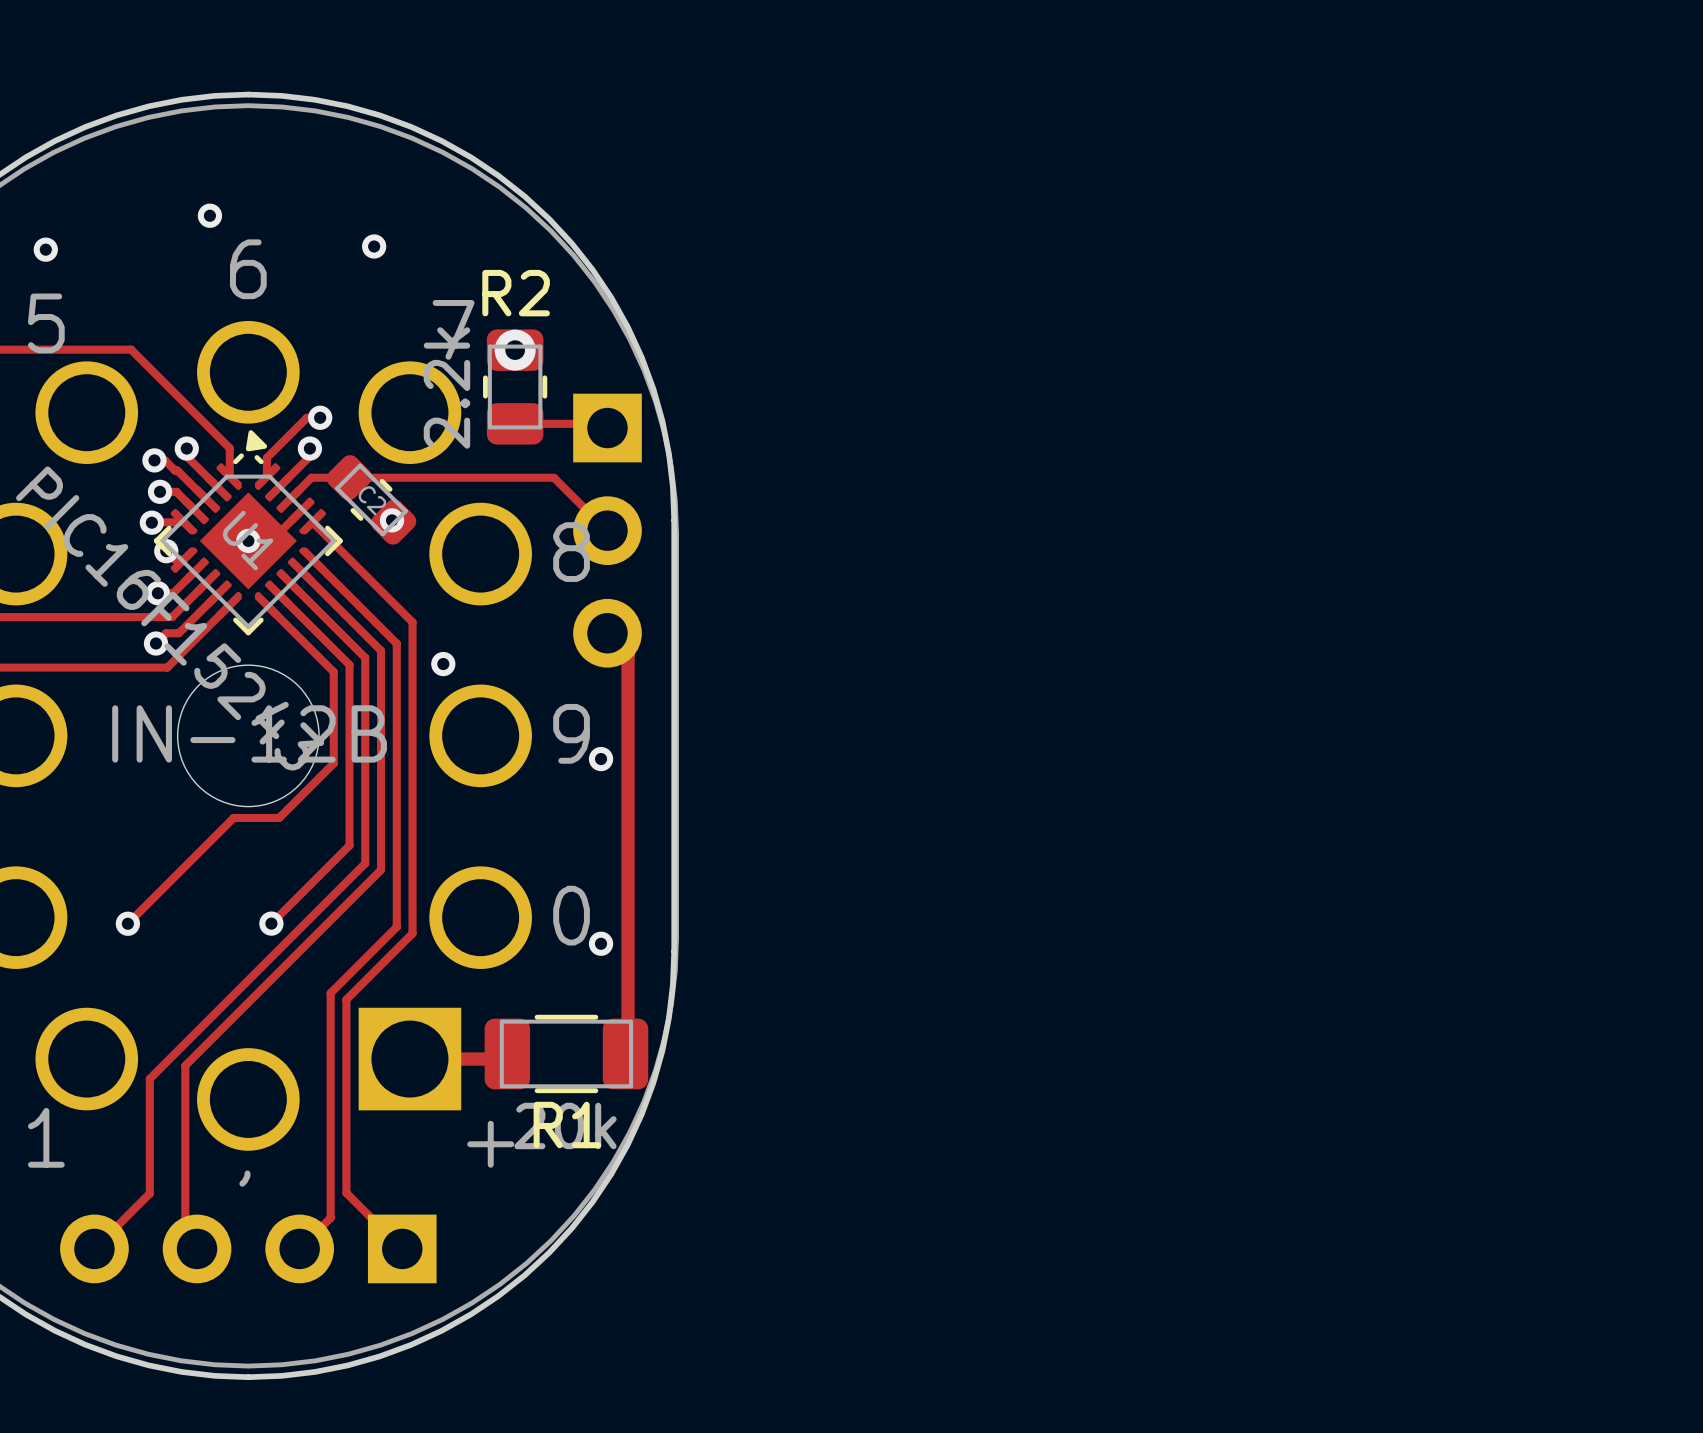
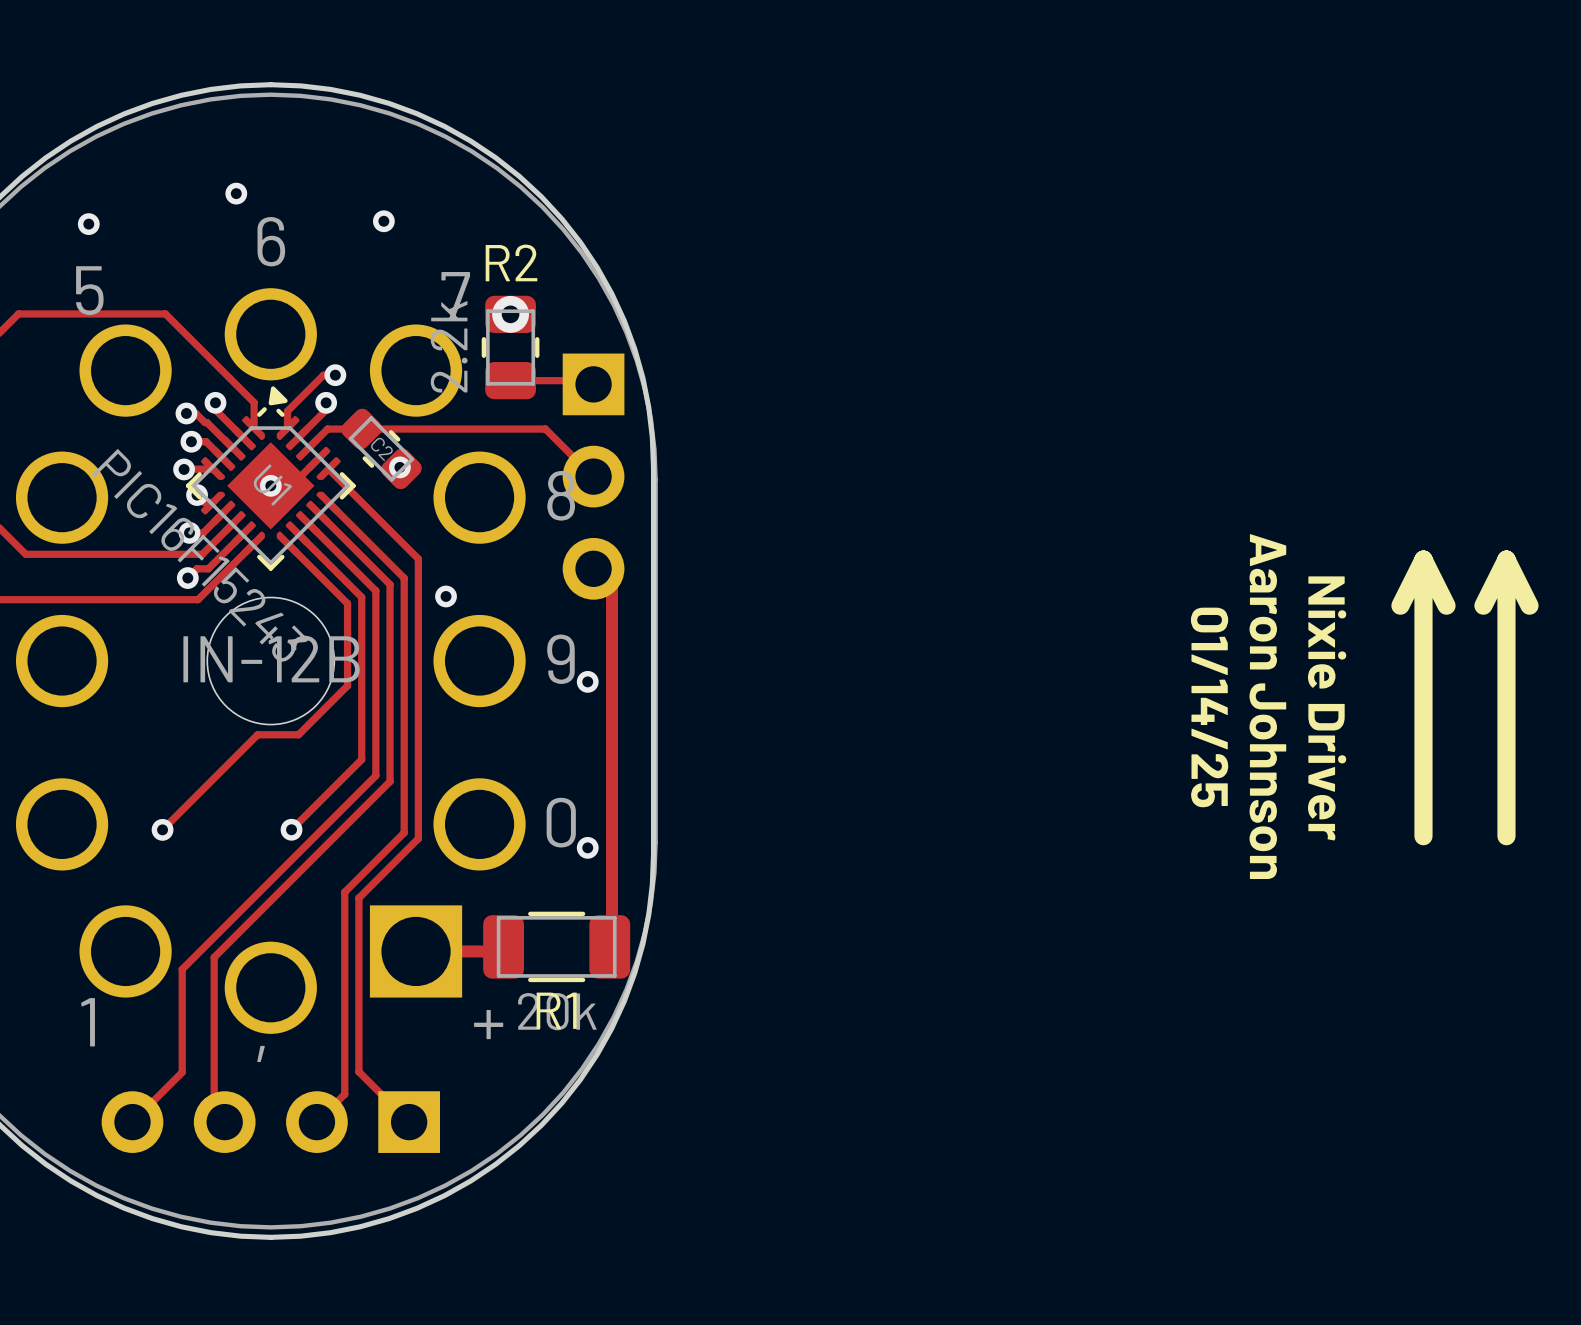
line: none -> (1423, 559) (1400, 605)
line: none -> (1423, 559) (1446, 605)
line: none -> (1423, 559) (1423, 836)
line: none -> (1506, 559) (1506, 836)
line: none -> (1506, 559) (1529, 605)
line: none -> (1506, 559) (1483, 605)
text: none -> Aaron Johnson (1267, 706)
text: none -> 01/14/25 (1209, 707)
text: none -> Nixie Driver (1327, 708)

